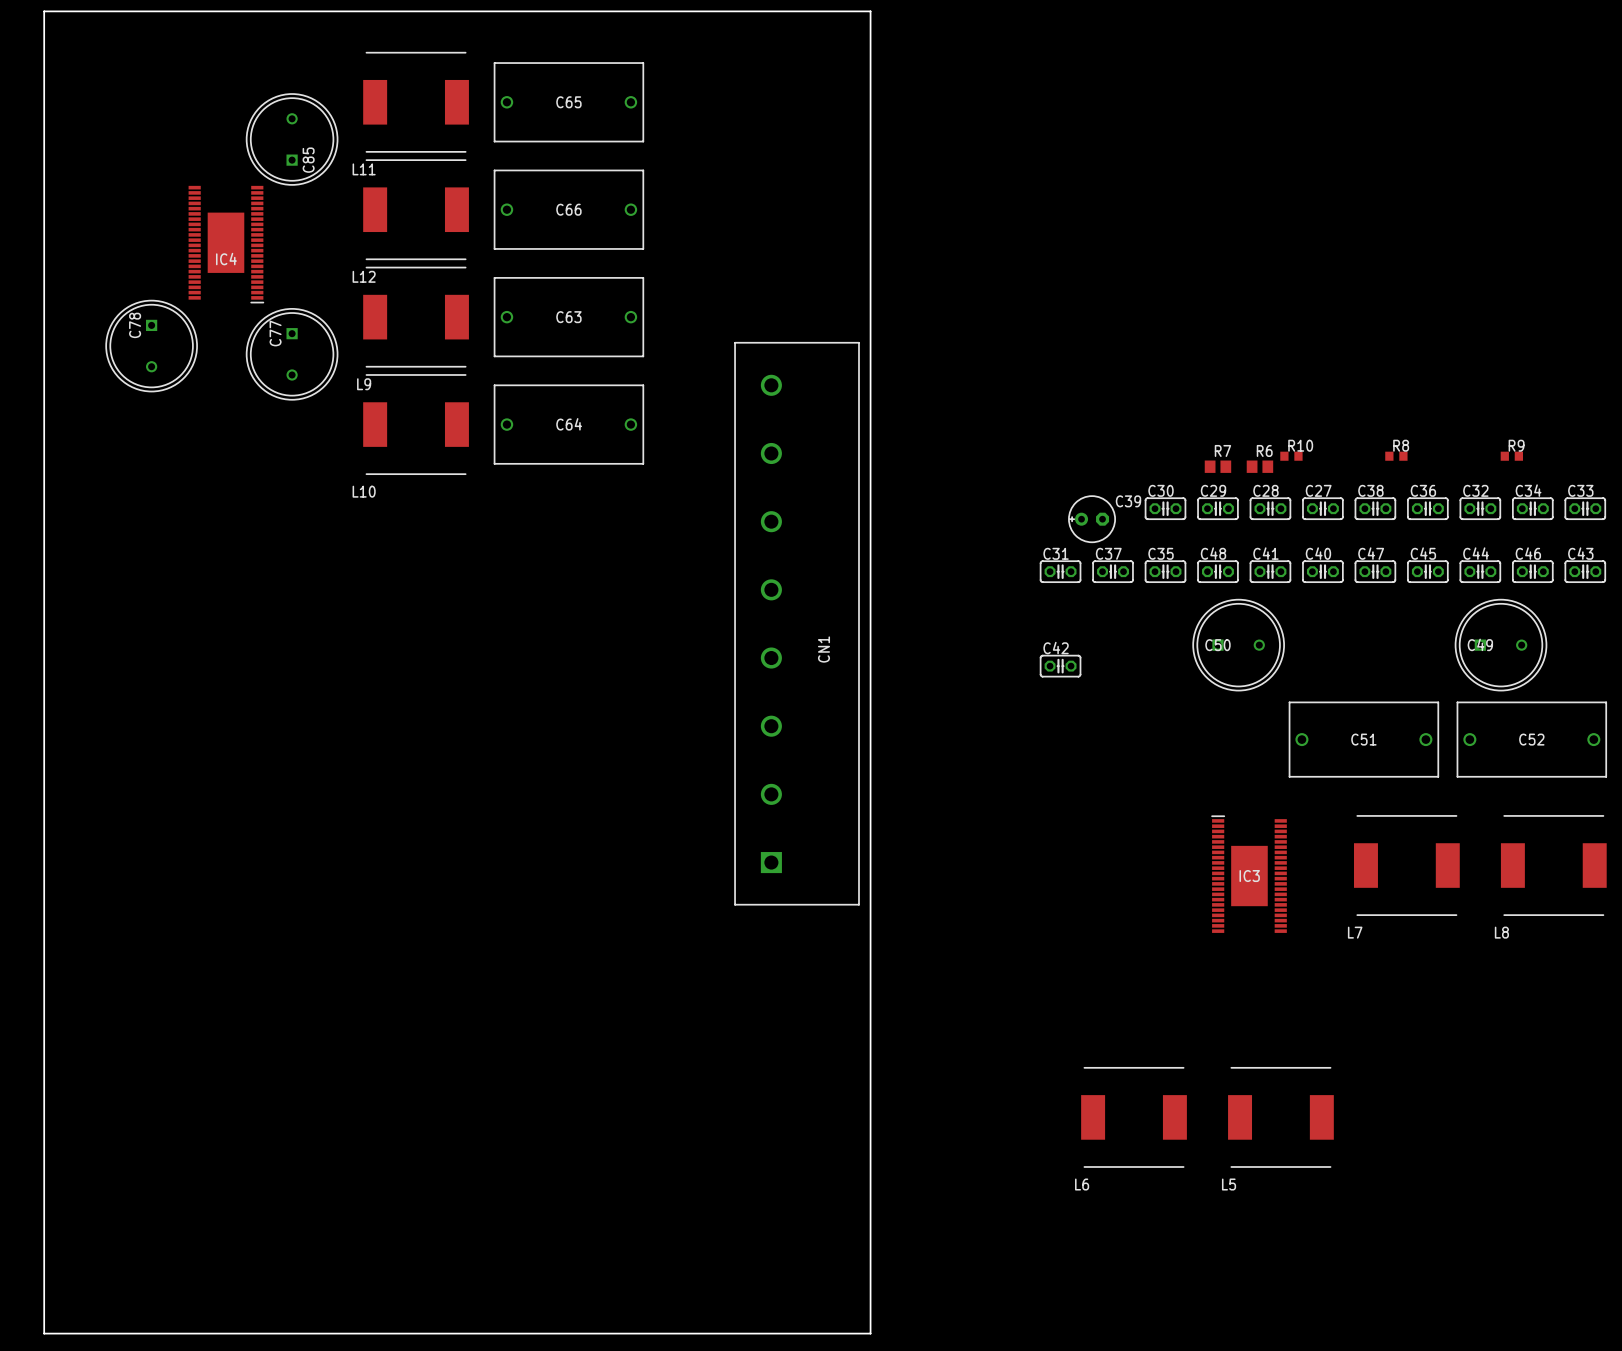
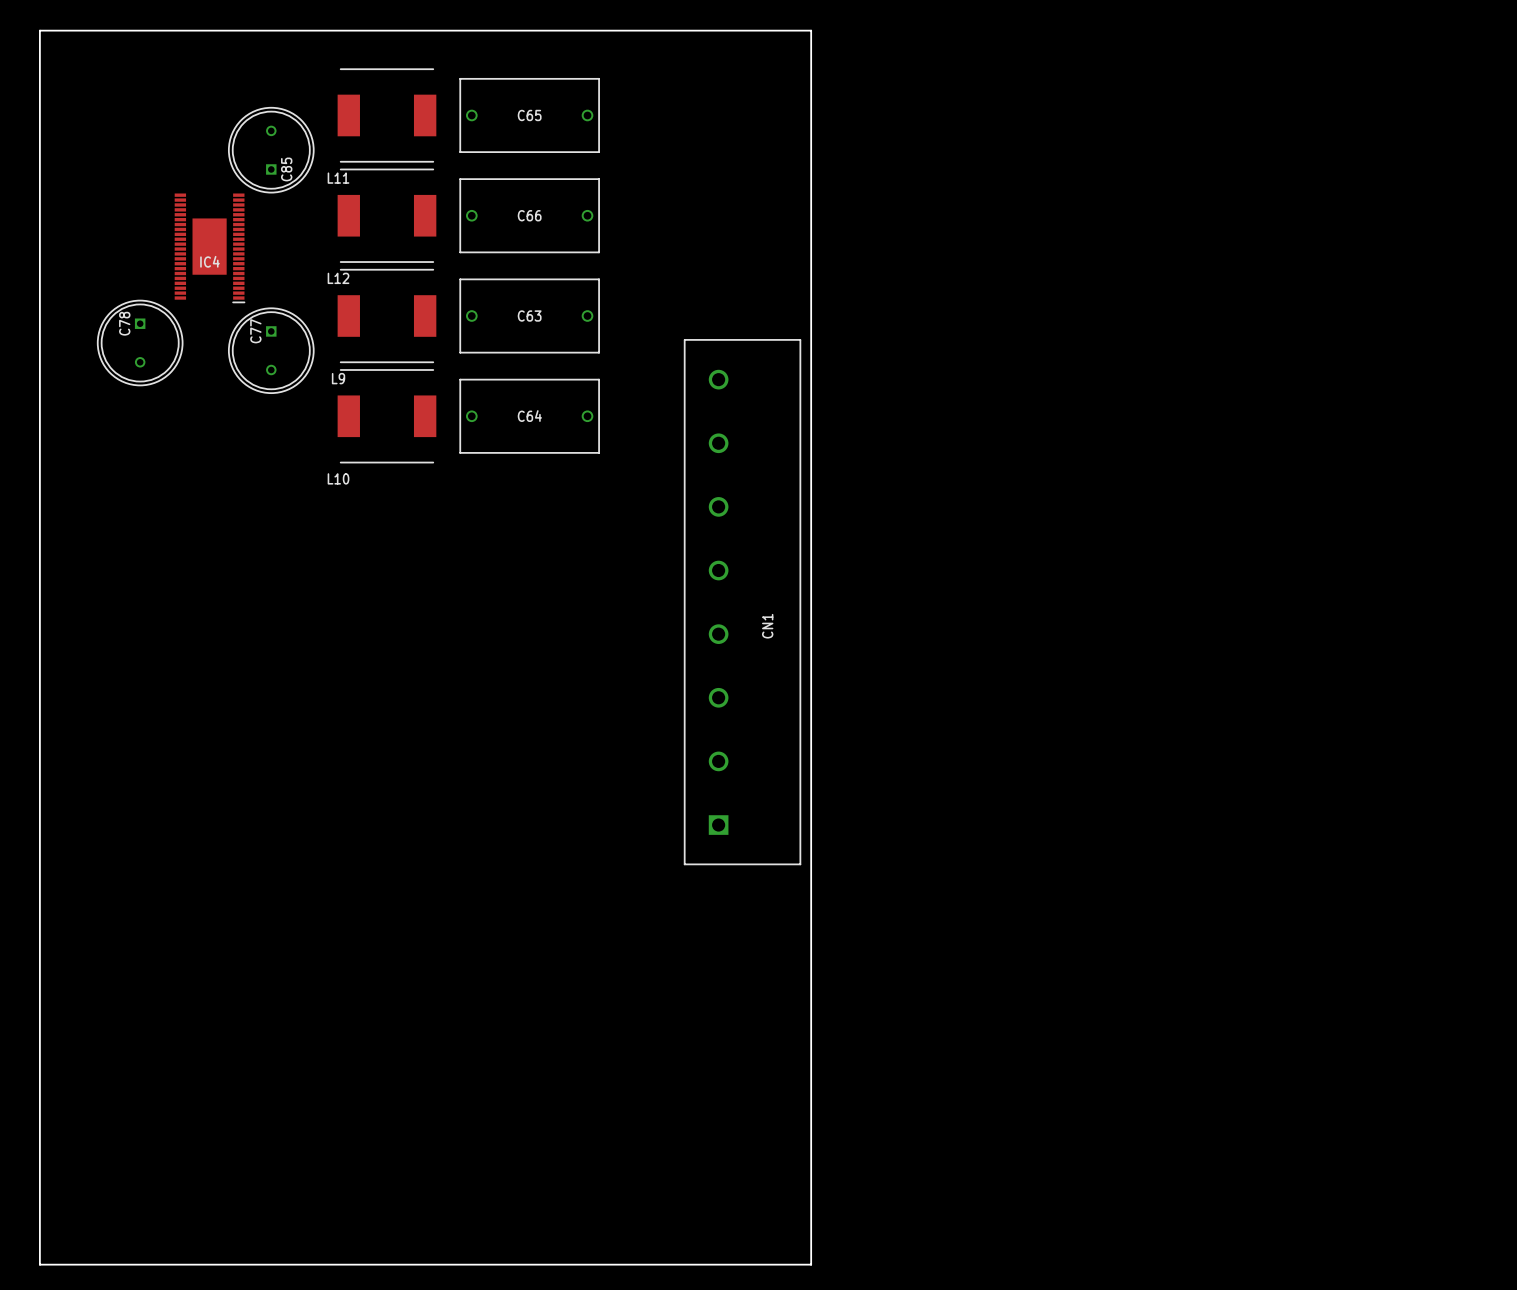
R10: (1291, 456) -> none
R8: (1396, 456) -> none
R9: (1511, 456) -> none
R7: (1217, 466) -> none
R6: (1259, 466) -> none
C30: (1165, 508) -> none
C29: (1217, 508) -> none
C28: (1270, 508) -> none
C27: (1322, 508) -> none
C38: (1375, 508) -> none
C36: (1427, 508) -> none
C32: (1480, 508) -> none
C34: (1532, 508) -> none
C33: (1585, 508) -> none
C39: (1092, 519) -> none
C31: (1060, 571) -> none
C37: (1113, 571) -> none
C35: (1165, 571) -> none
C48: (1217, 571) -> none
C41: (1270, 571) -> none
C40: (1322, 571) -> none
C47: (1375, 571) -> none
C45: (1427, 571) -> none
C44: (1480, 571) -> none
C46: (1532, 571) -> none
C43: (1585, 571) -> none
C50: (1238, 645) -> none
C49: (1501, 645) -> none
C42: (1060, 666) -> none
C51: (1363, 739) -> none
C52: (1531, 739) -> none
L7: (1406, 865) -> none
L8: (1553, 865) -> none
IC3: (1249, 874) -> none
L6: (1134, 1117) -> none
L5: (1280, 1117) -> none

